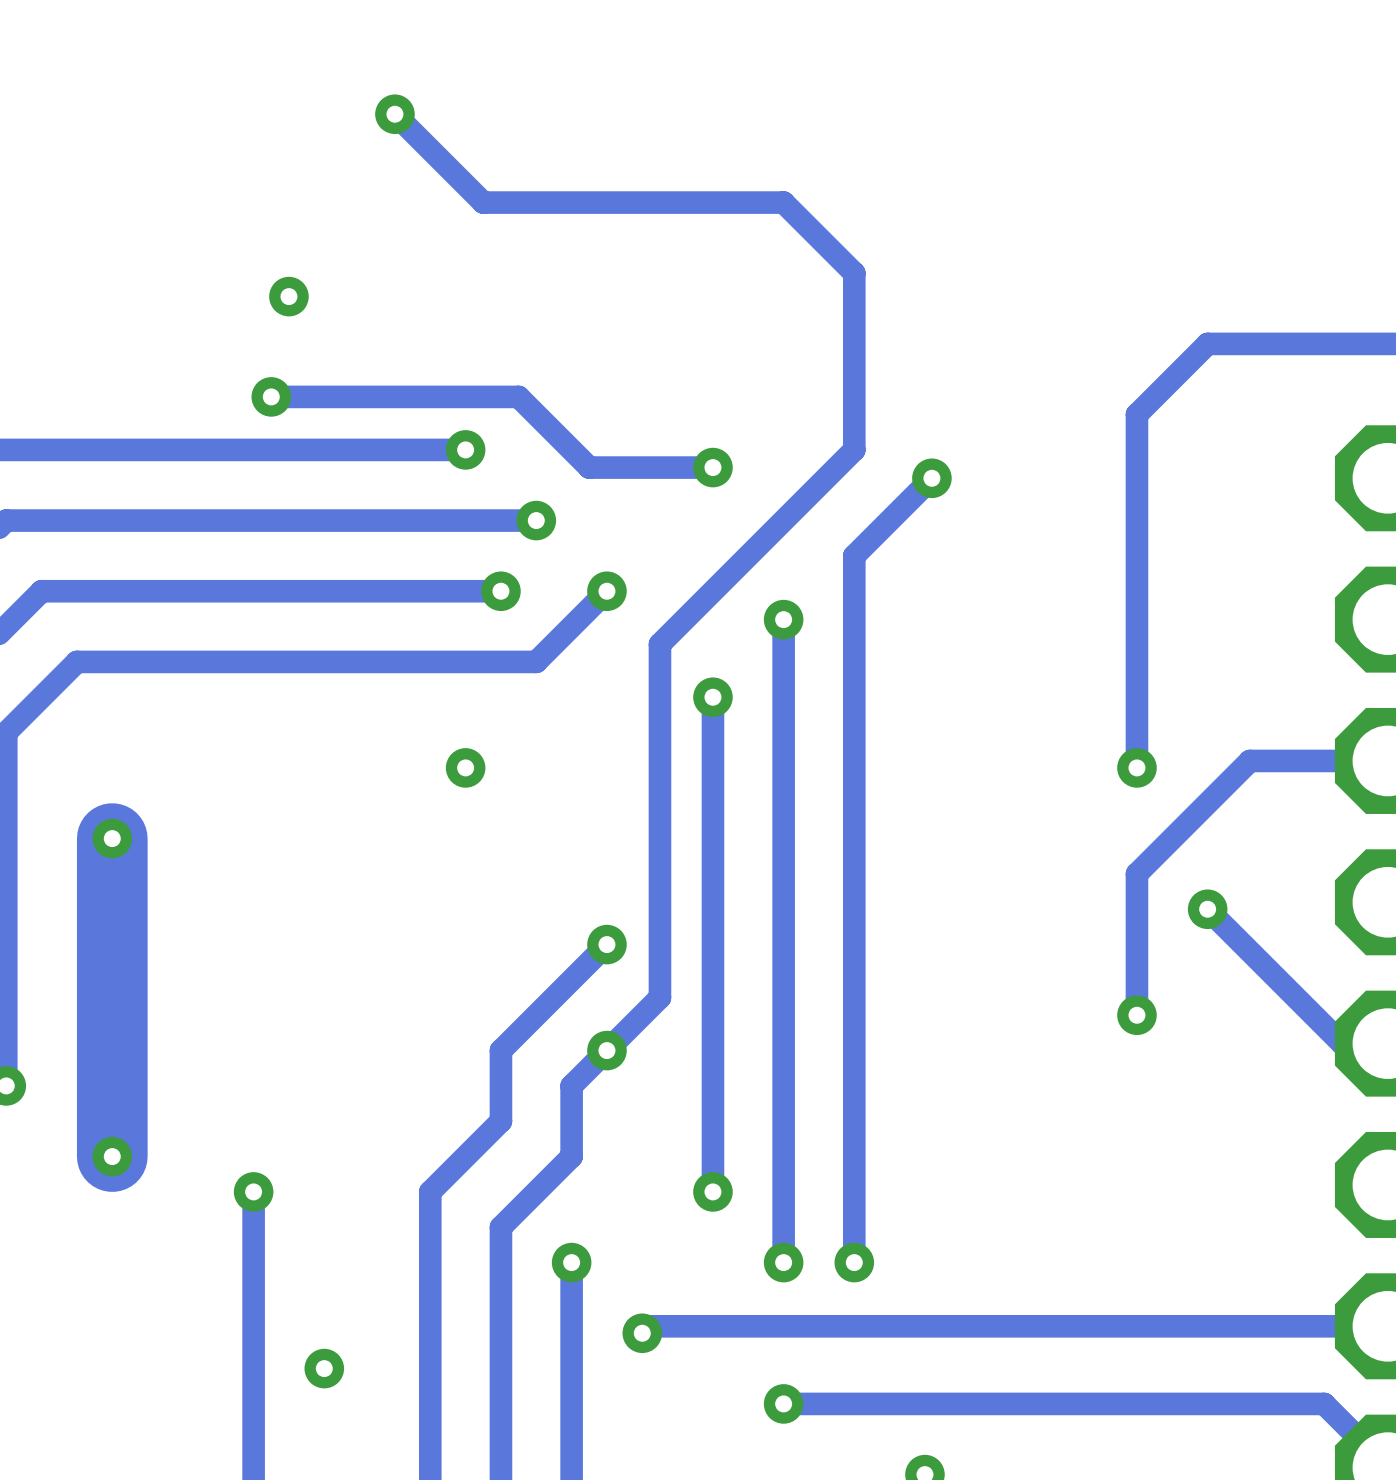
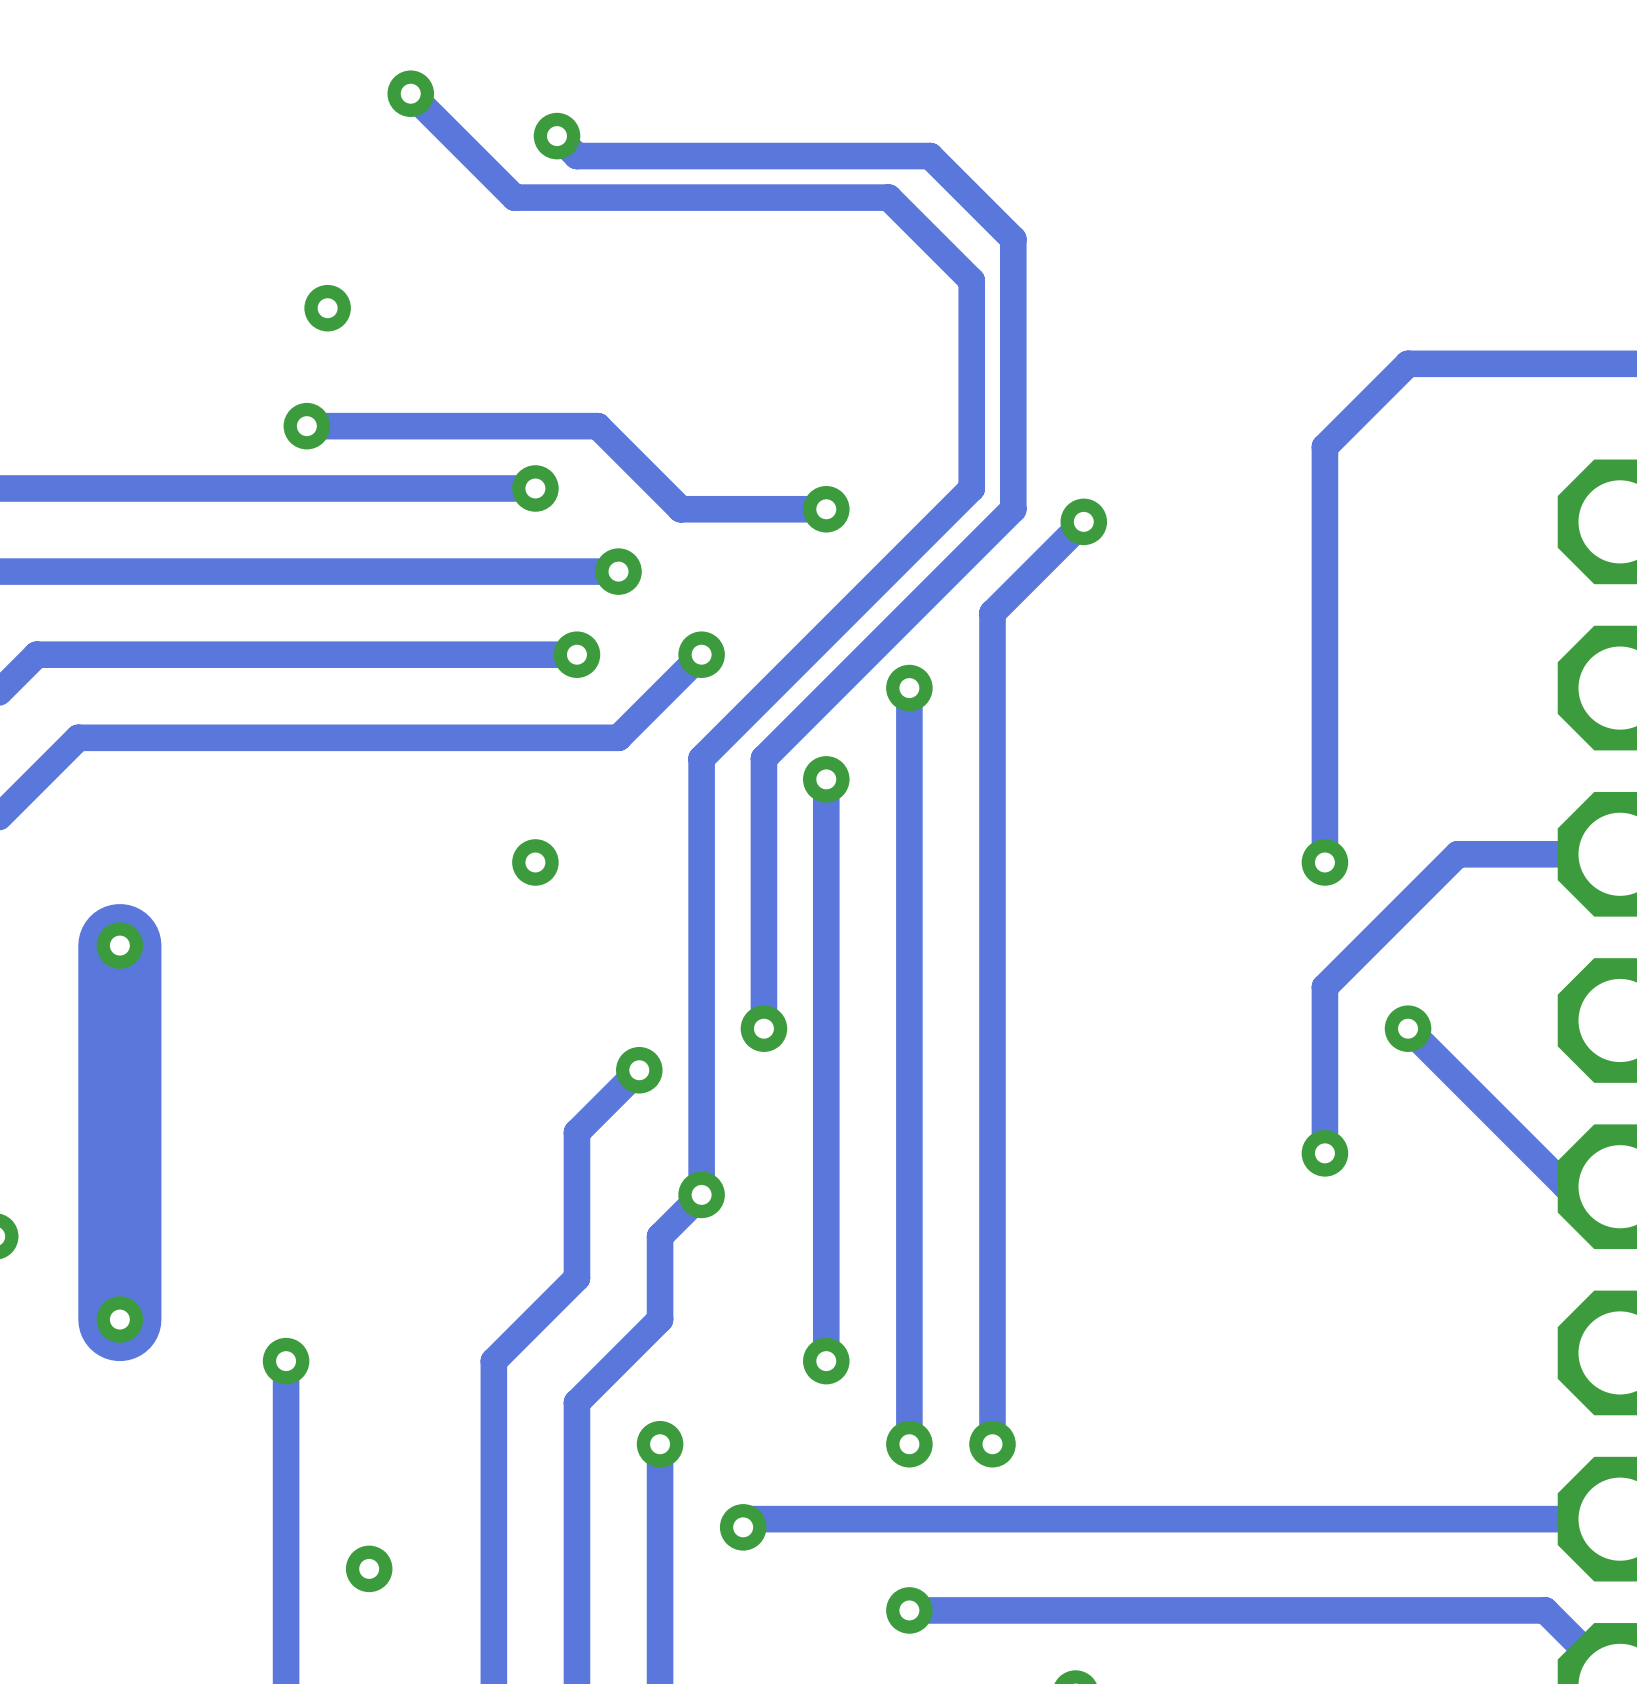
track: (394, 114) (483, 202) -> (410, 93) (514, 197) (556, 197)
via position: (394, 114) -> (410, 93)
via: none -> (557, 136)
track: (765, 202) (783, 202) (854, 273) (854, 449) (659, 644) (659, 679) -> (557, 136) (576, 156) (930, 156) (1013, 239) (1013, 509) (763, 758)
track: (659, 909) (659, 997) (606, 1050) -> (888, 197) (971, 280) (971, 488) (701, 758) (701, 1194)
via: none -> (763, 1028)
via: none -> (639, 1070)
track: (606, 944) (500, 1050) -> (639, 1070) (576, 1132) (576, 1194)
via: (606, 944) -> none

